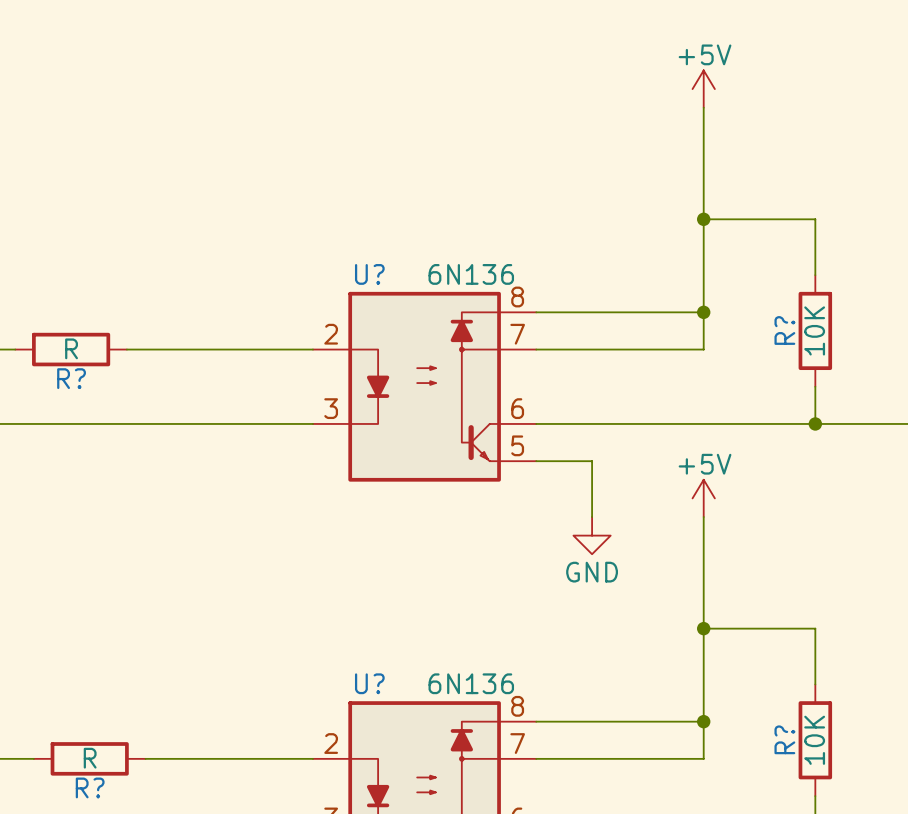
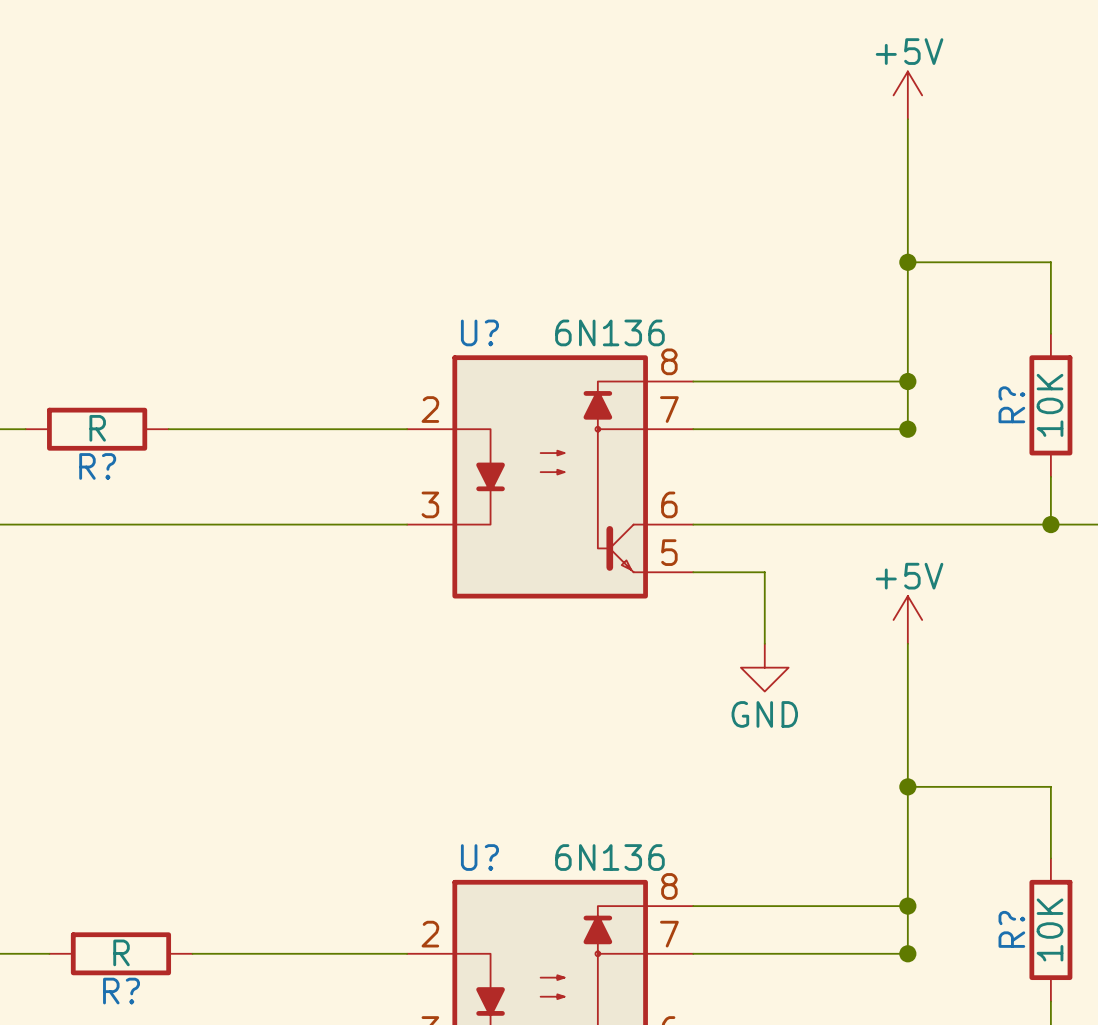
junction: none -> (907, 429)
junction: none -> (907, 953)

